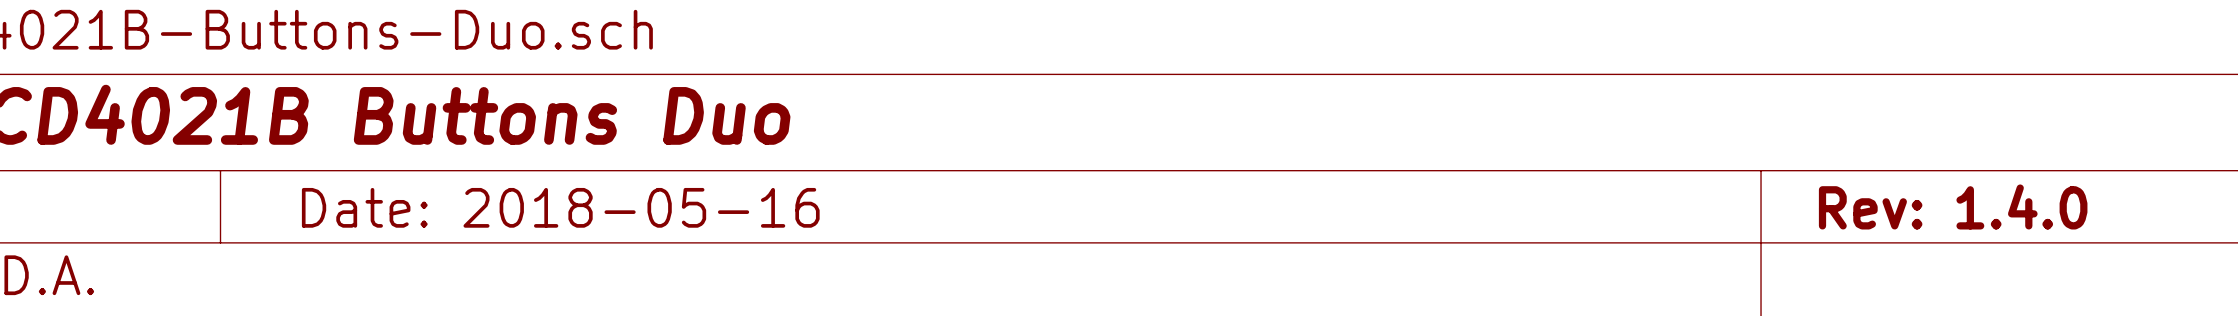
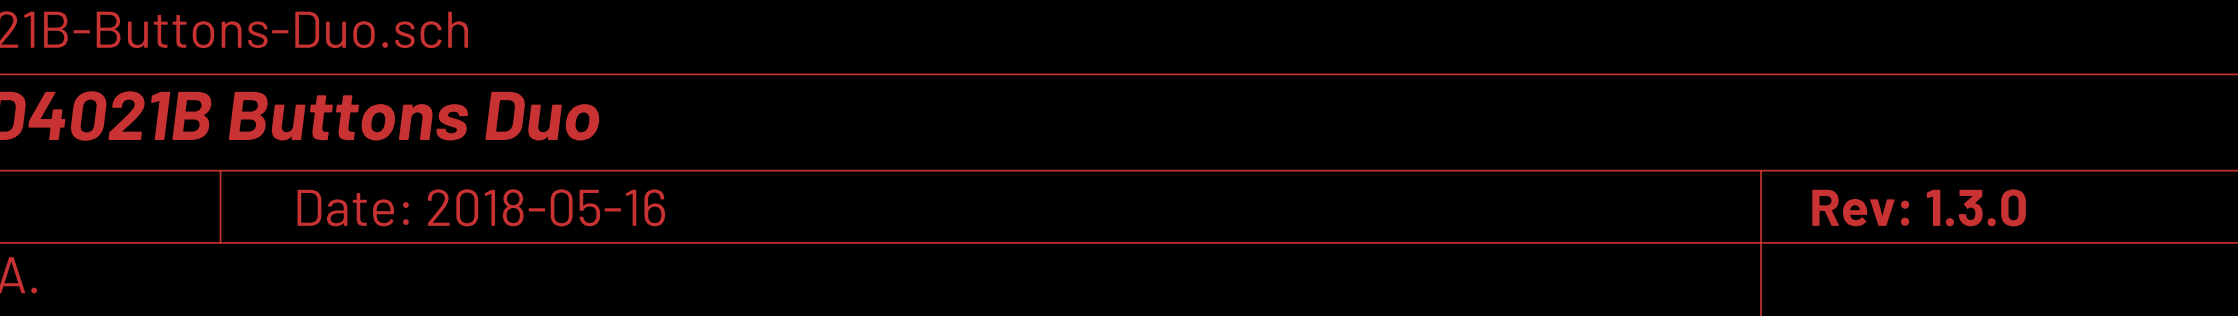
title block: Rev: 1.4.0 (1953, 206) -> Rev: 1.3.0 (1919, 207)

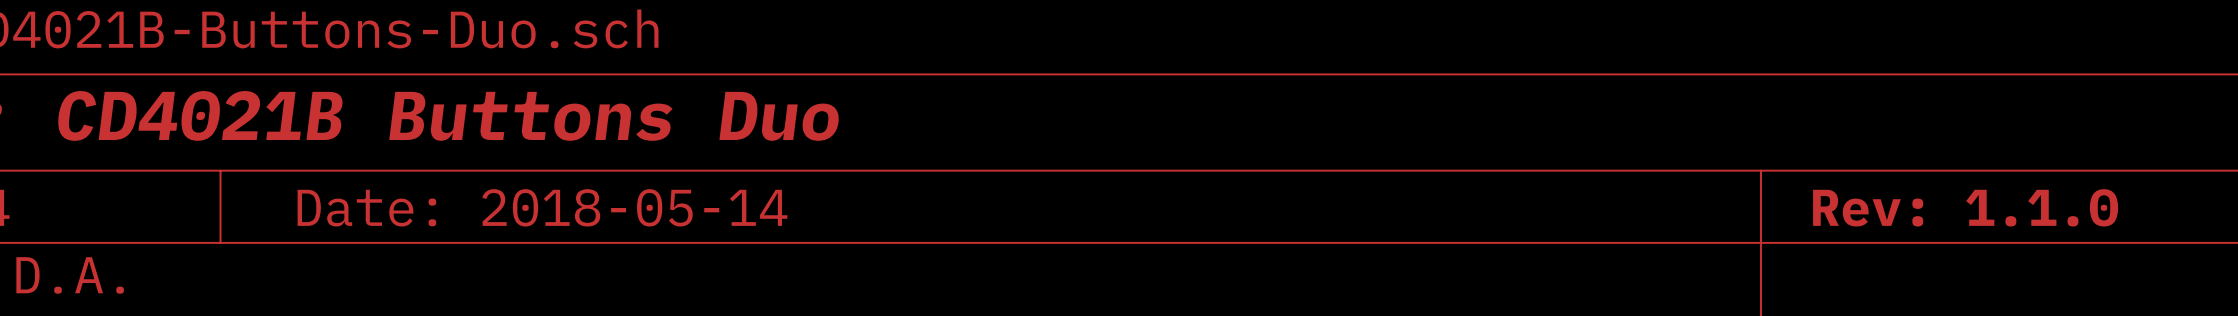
title block: Date: 2018-05-16 (481, 207) -> Date: 2018-05-14 (542, 207)
title block: Rev: 1.3.0 (1919, 207) -> Rev: 1.1.0 (1965, 207)

